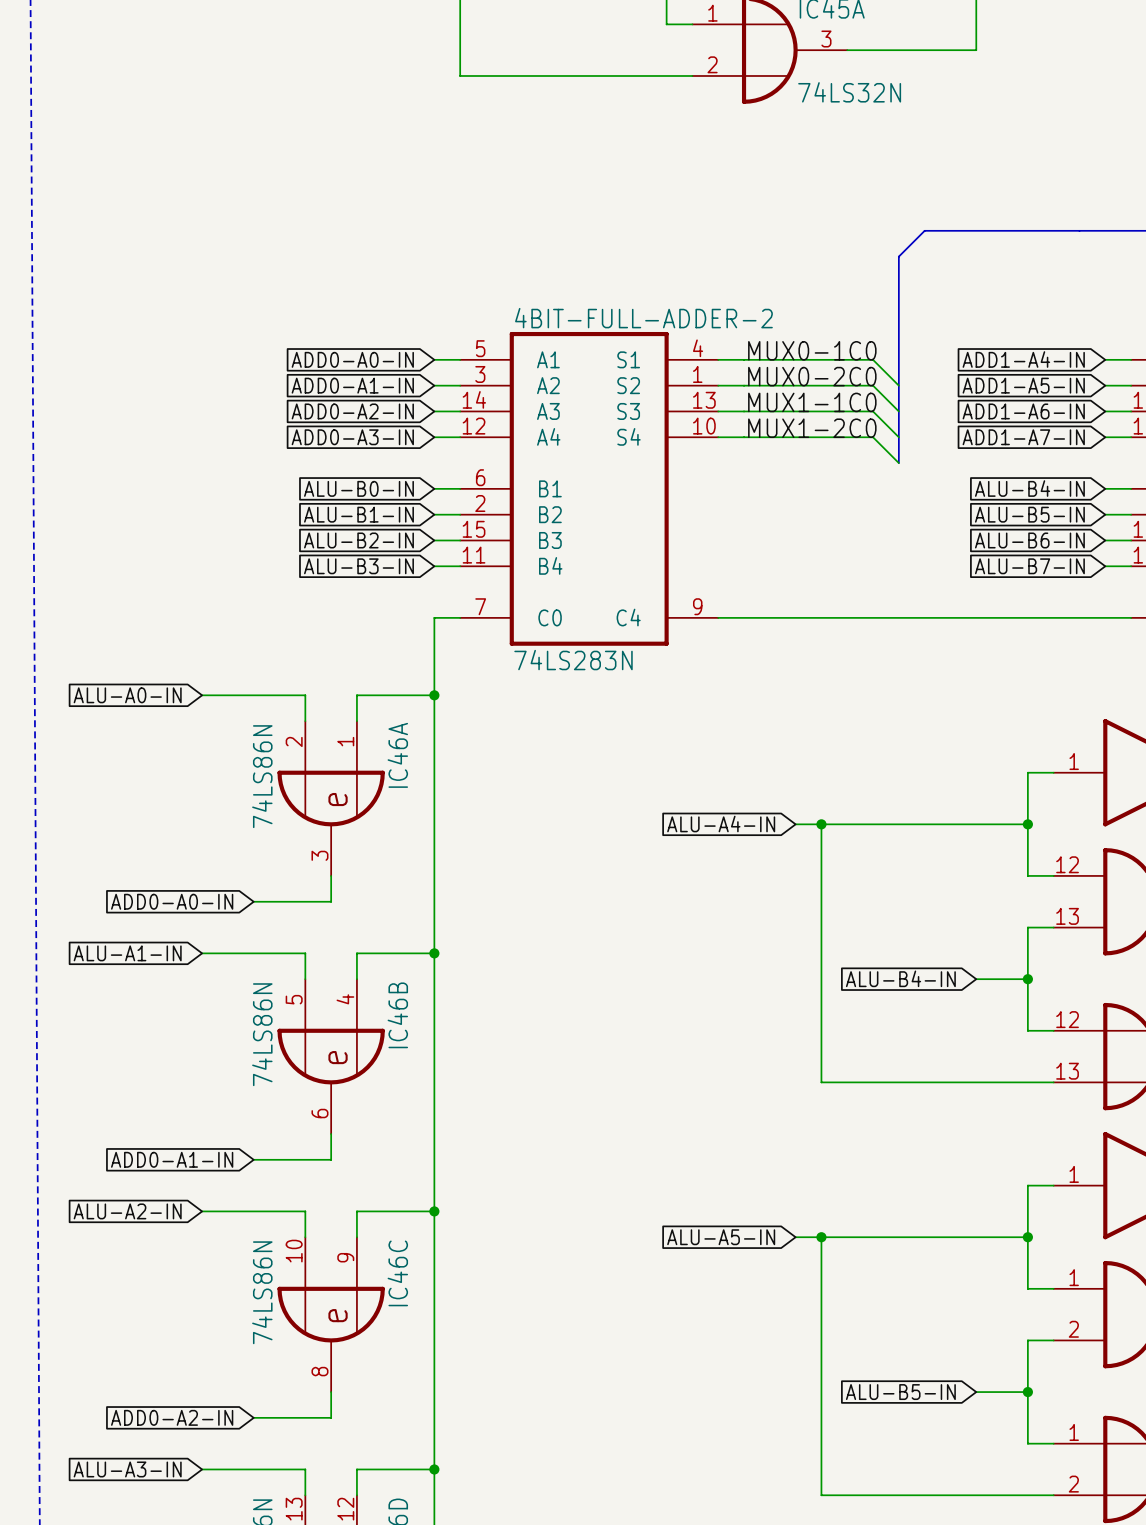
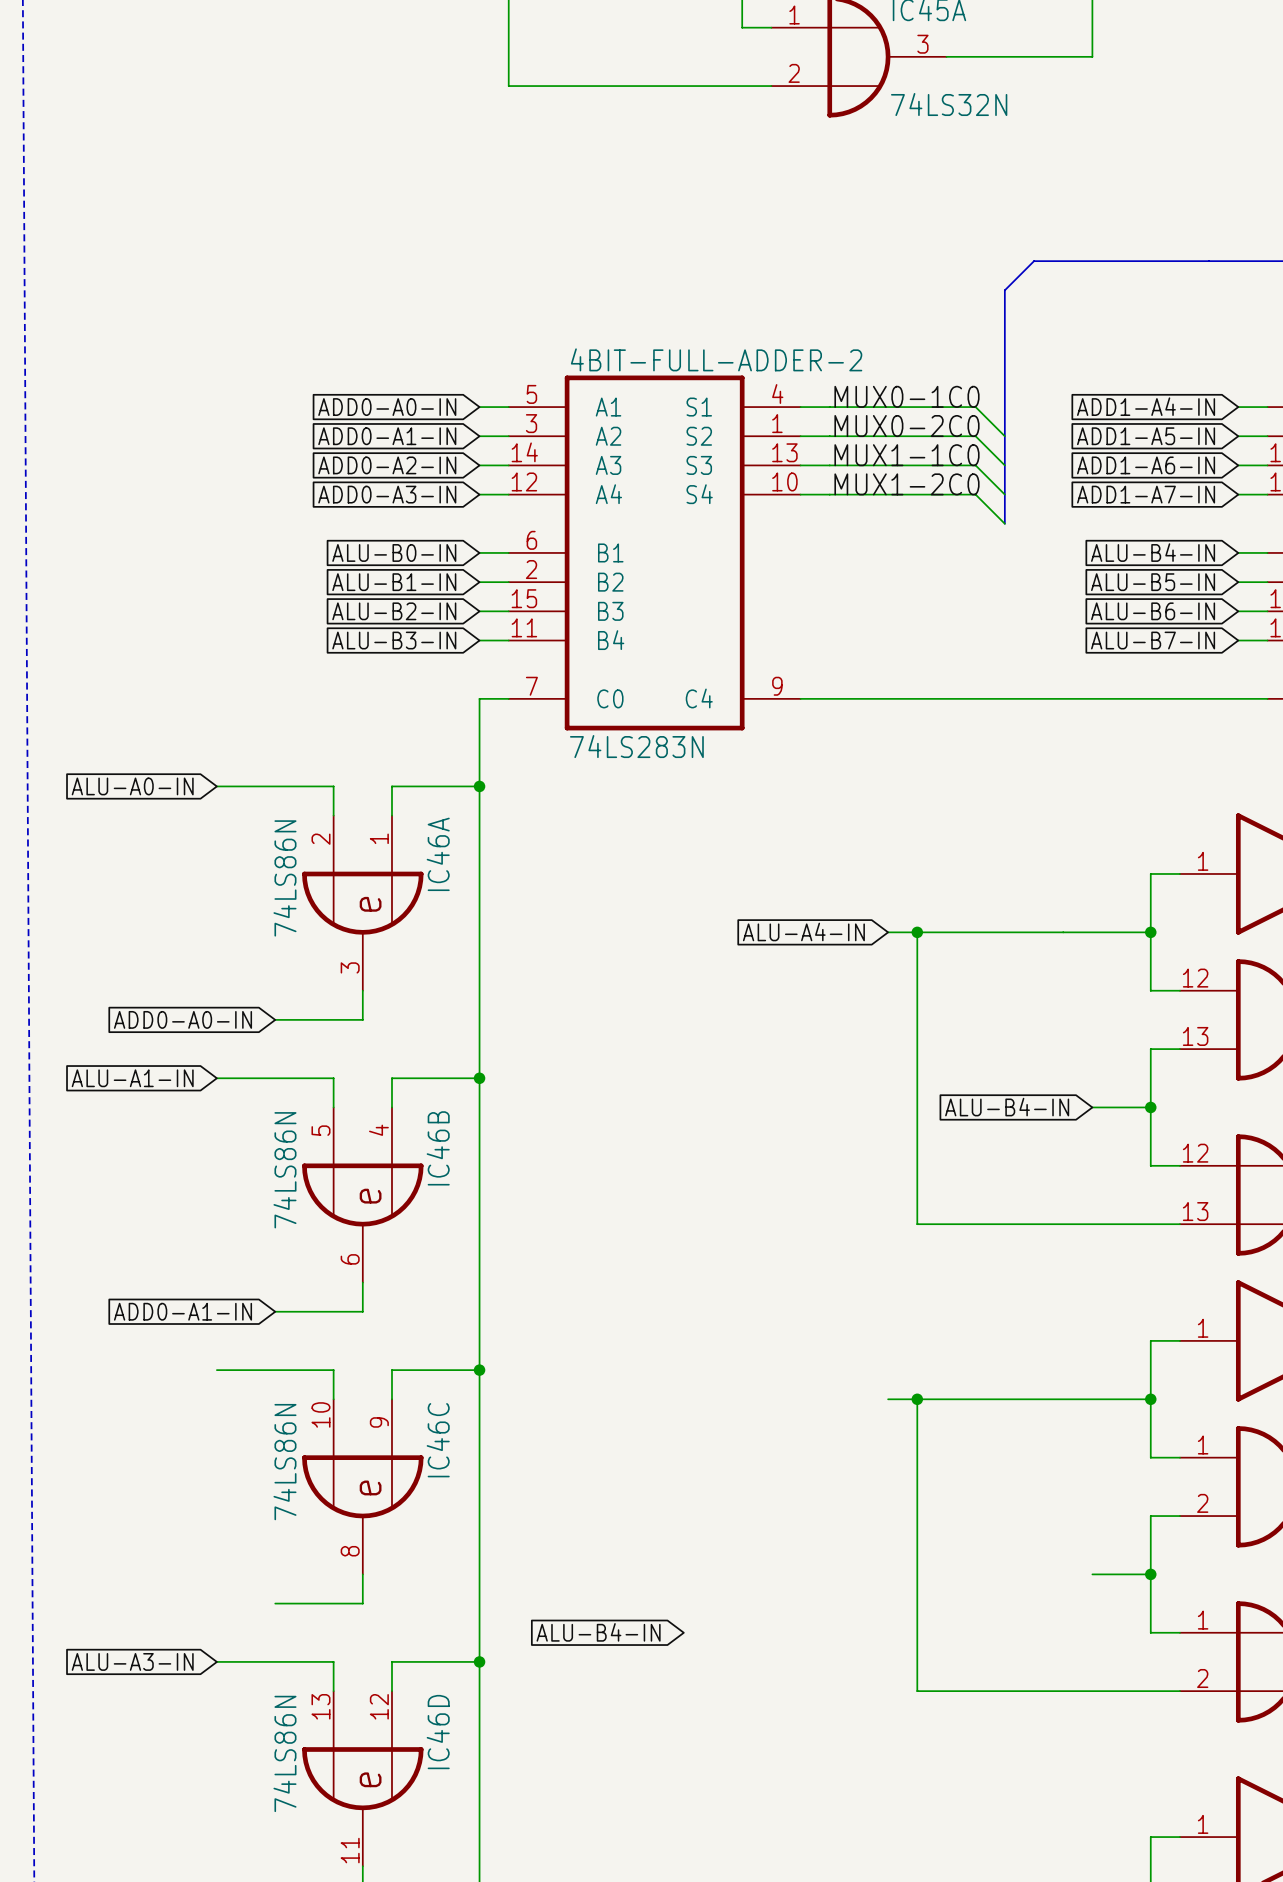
global label: ALU-A2-IN (127, 1211) -> none
global label: ALU-A5-IN (721, 1237) -> none
global label: ALU-B5-IN (900, 1392) -> none
global label: ADD0-A2-IN (172, 1417) -> none
global label: none -> ALU-B4-IN (598, 1632)

